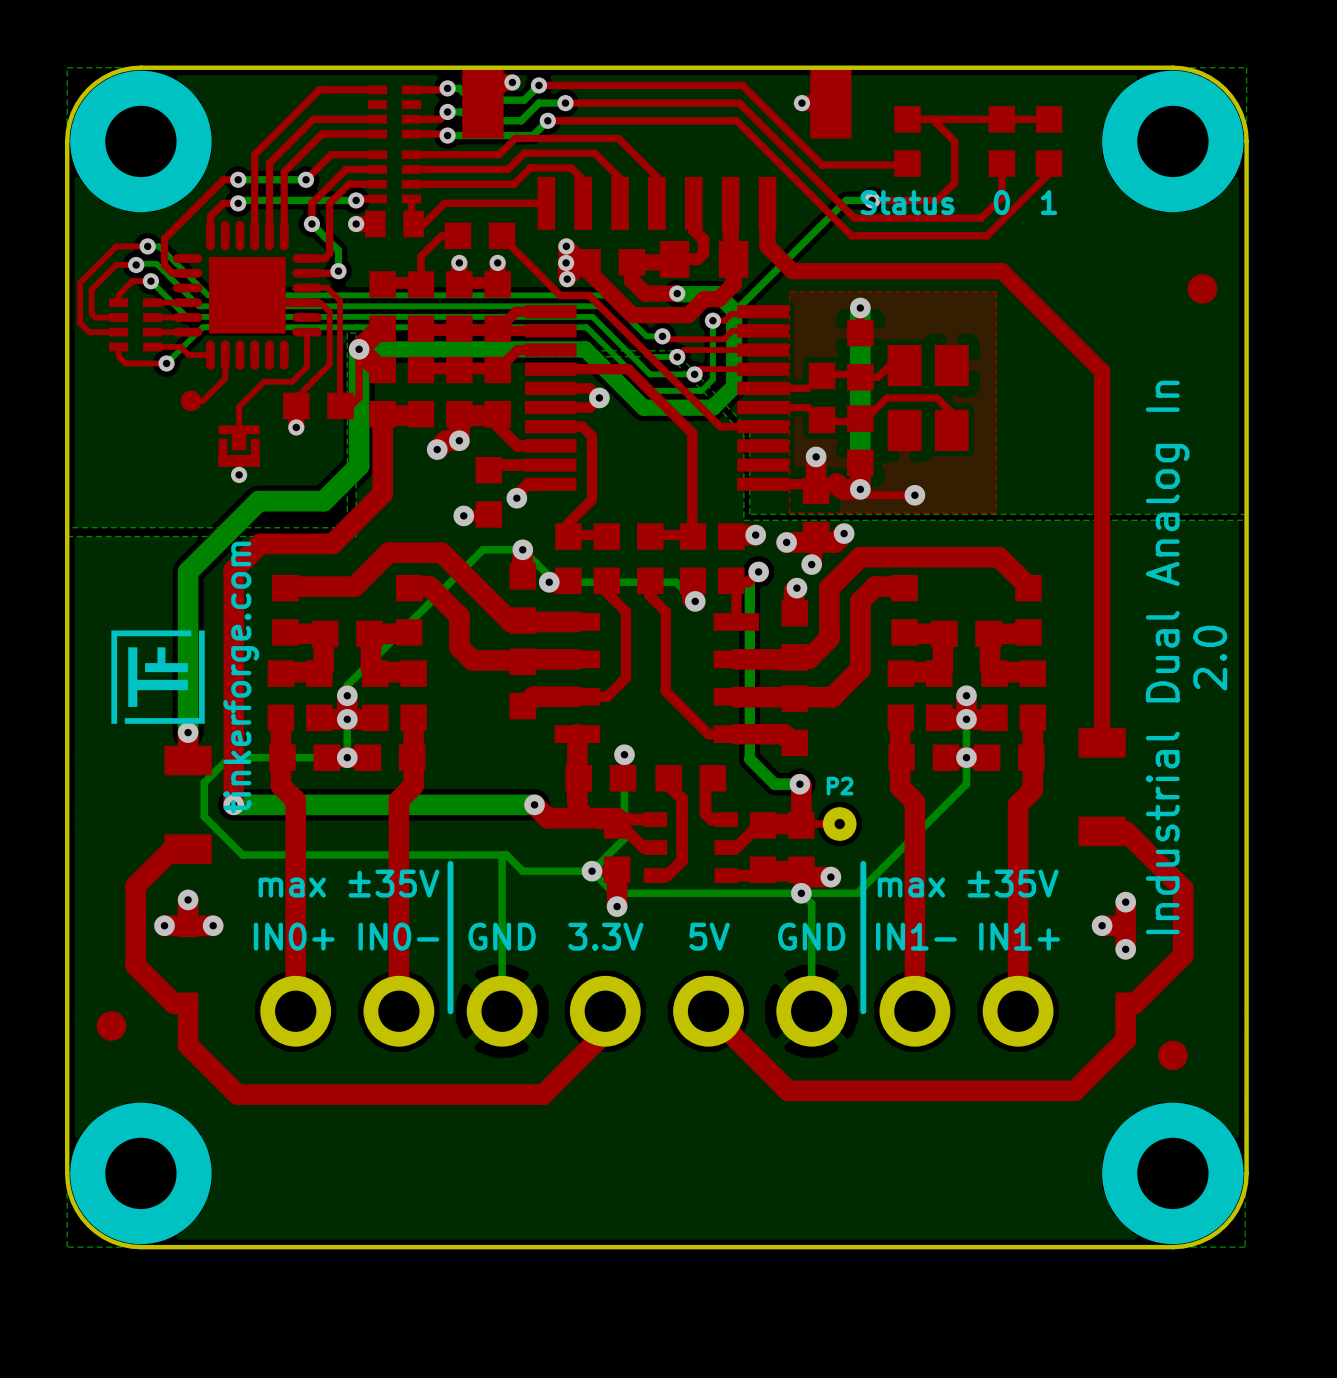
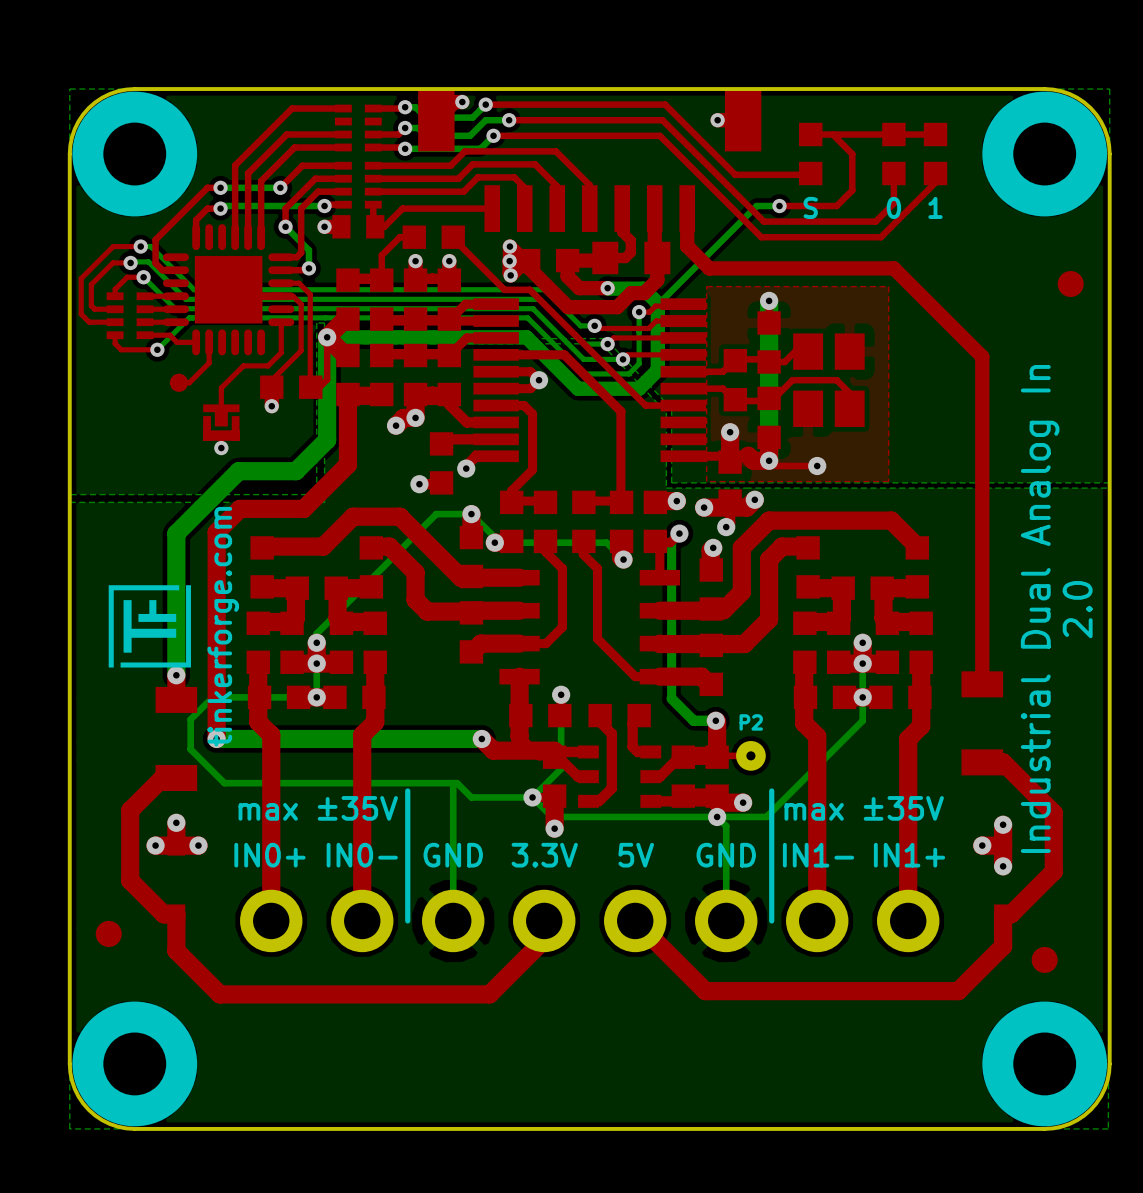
text: Status (907, 202) -> S (810, 207)

